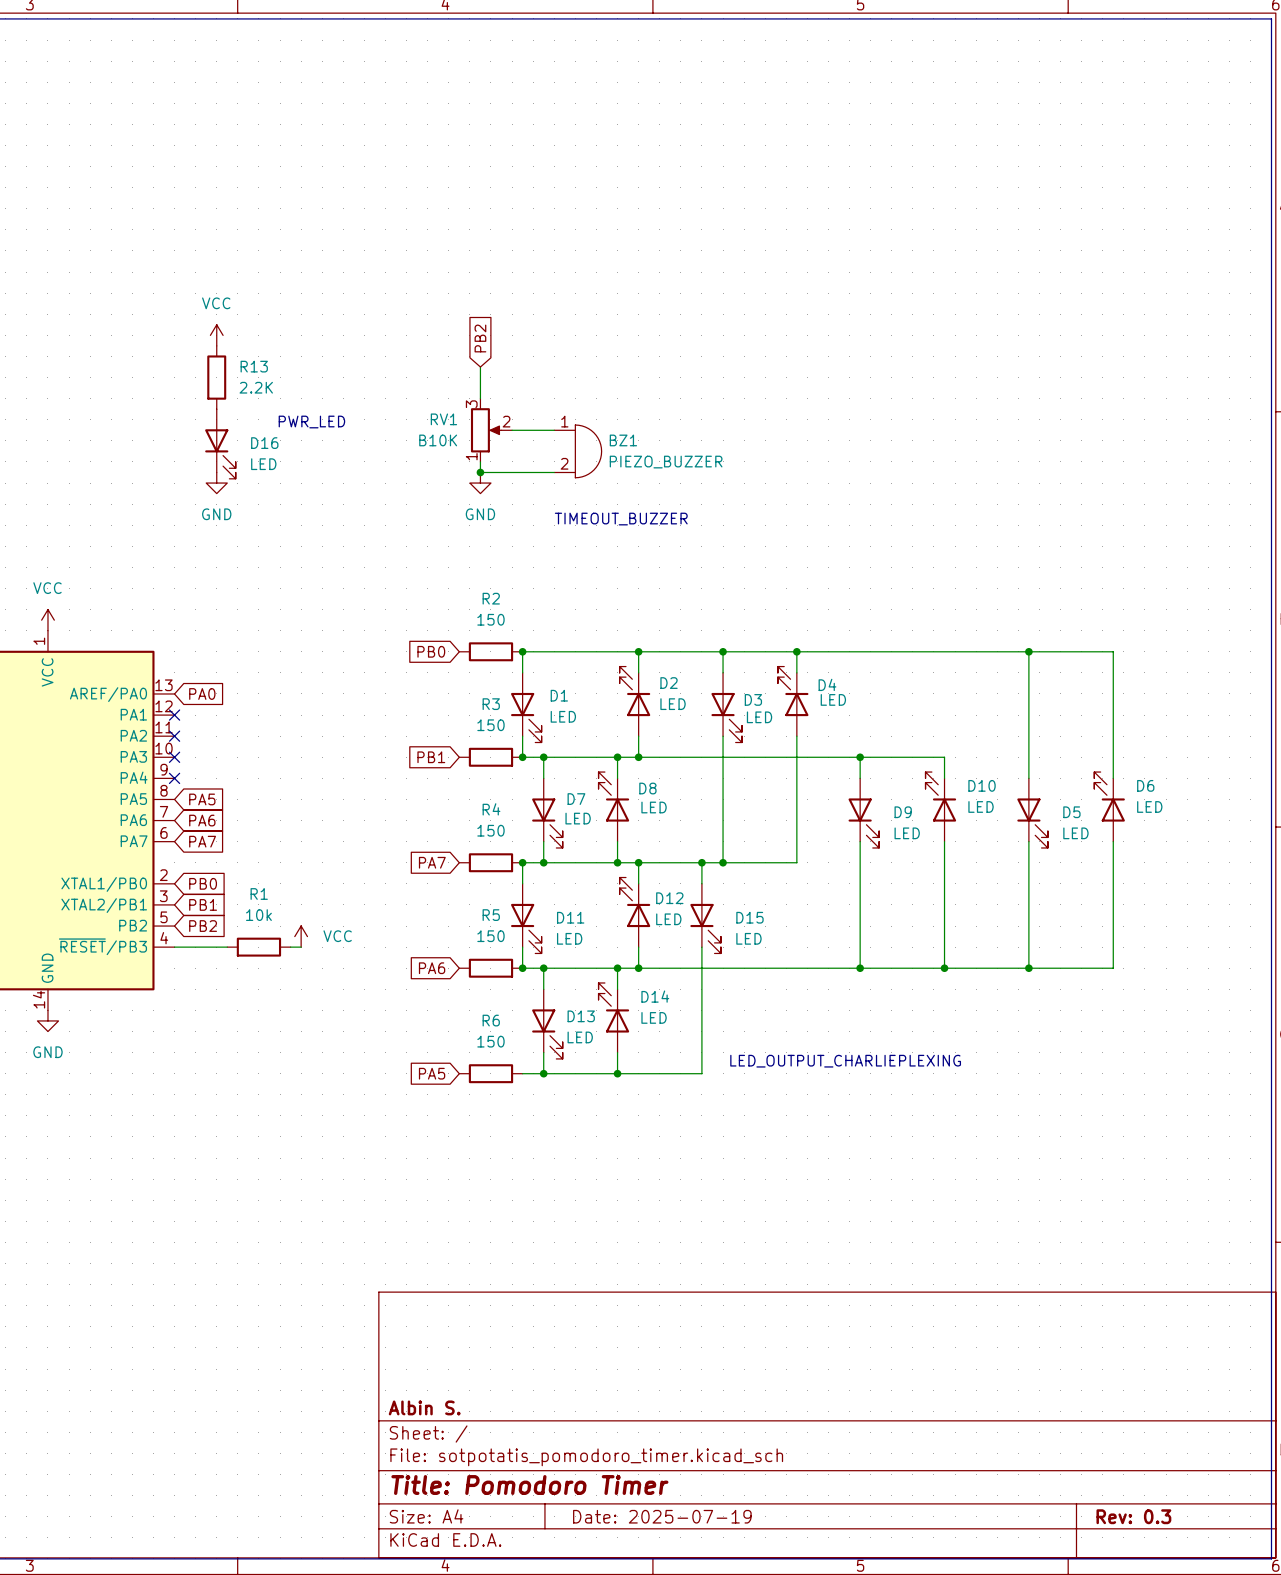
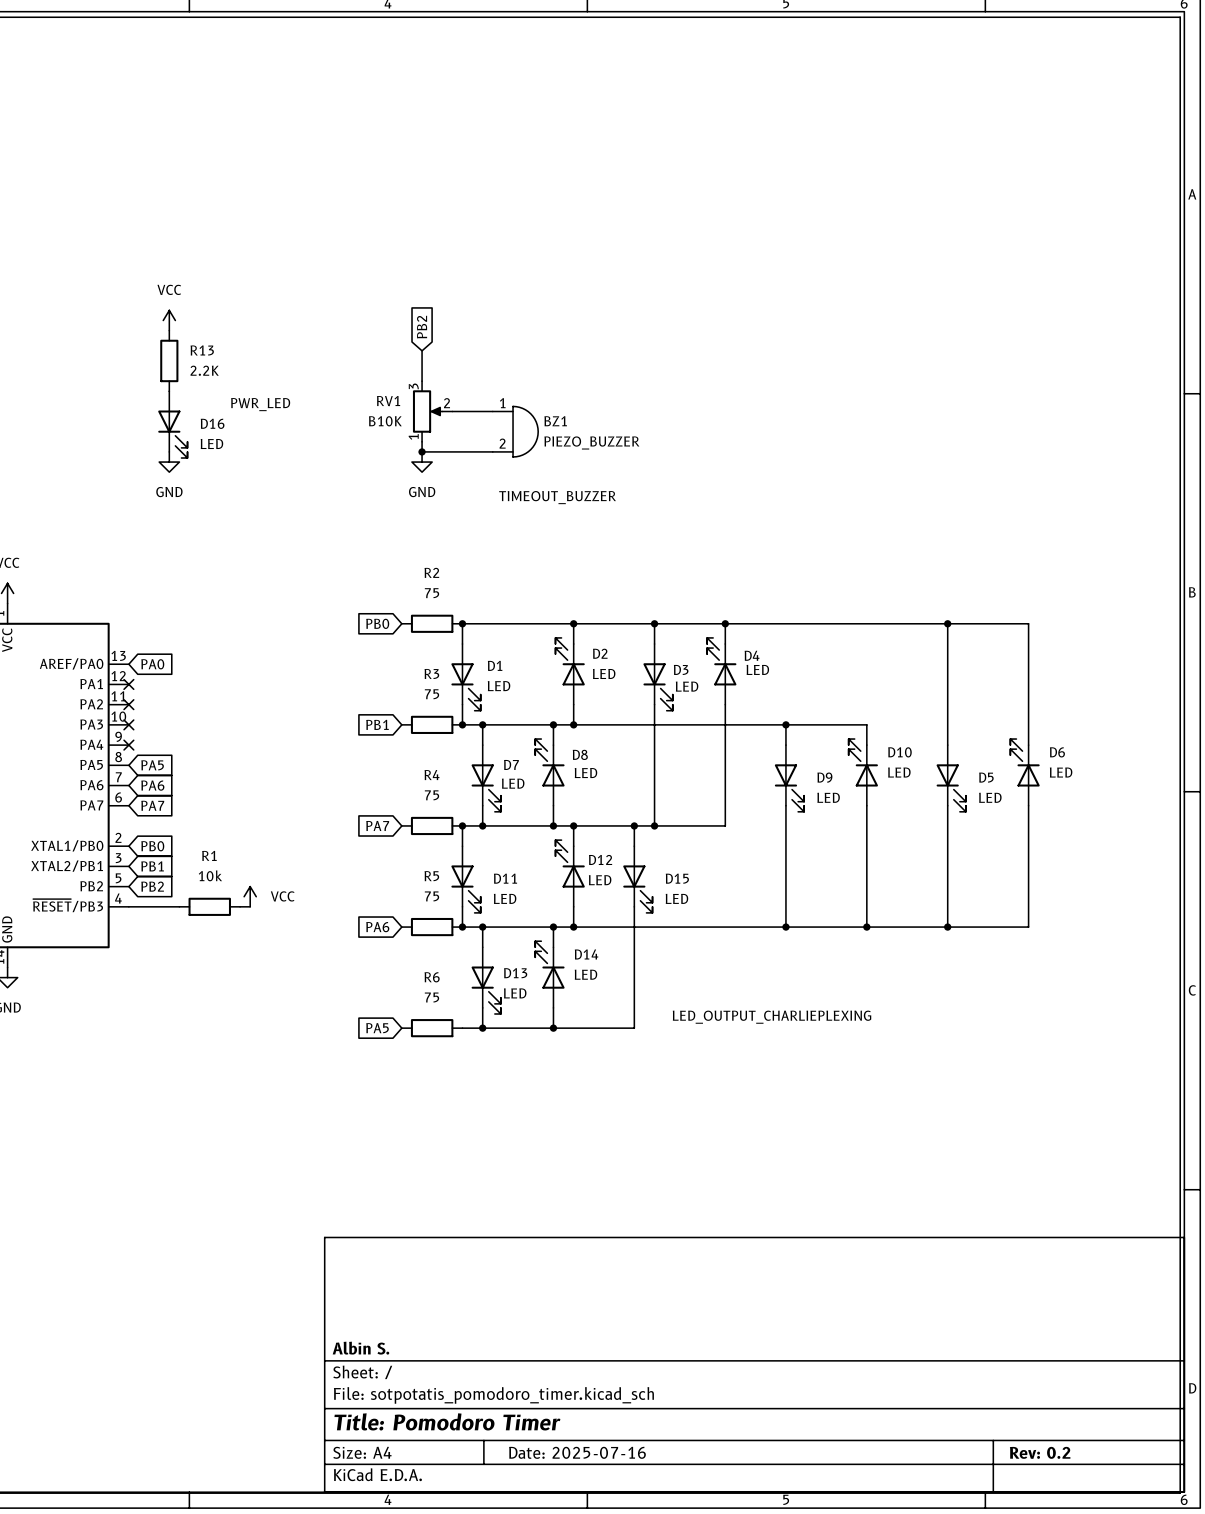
R2 value: 150 (490, 619) -> 75 (431, 593)
R3 value: 150 (490, 725) -> 75 (431, 694)
R4 value: 150 (490, 830) -> 75 (431, 795)
R5 value: 150 (490, 936) -> 75 (431, 896)
R6 value: 150 (490, 1041) -> 75 (431, 997)
title block: Date: 2025-07-19 (662, 1516) -> Date: 2025-07-16 (577, 1452)
title block: Rev: 0.3 (1133, 1516) -> Rev: 0.2 (1040, 1452)

